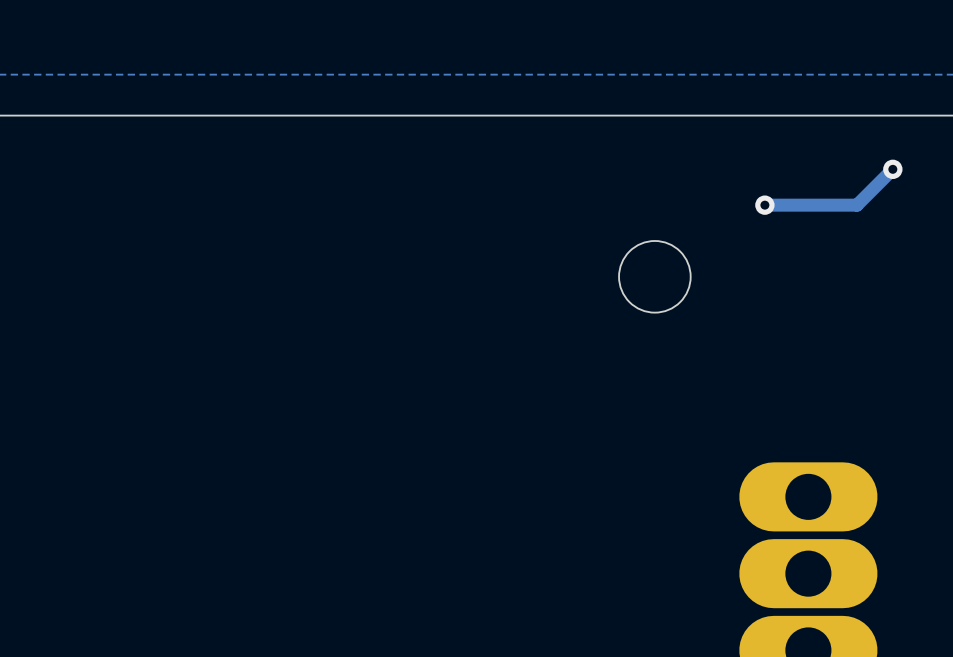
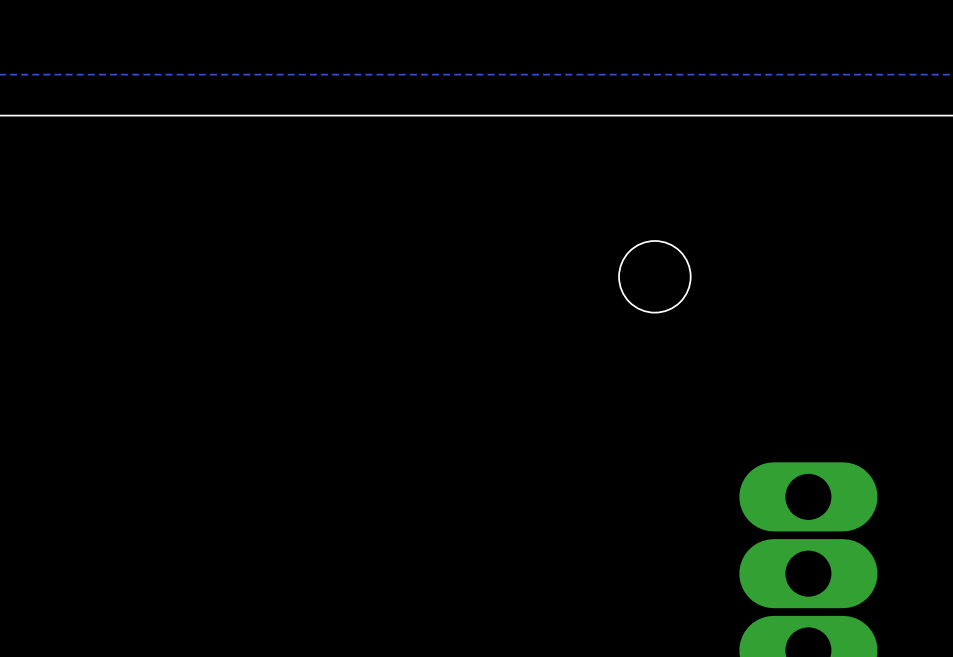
track: (892, 169) (857, 205) (764, 205) -> none
via: (892, 169) -> none
via: (764, 205) -> none

